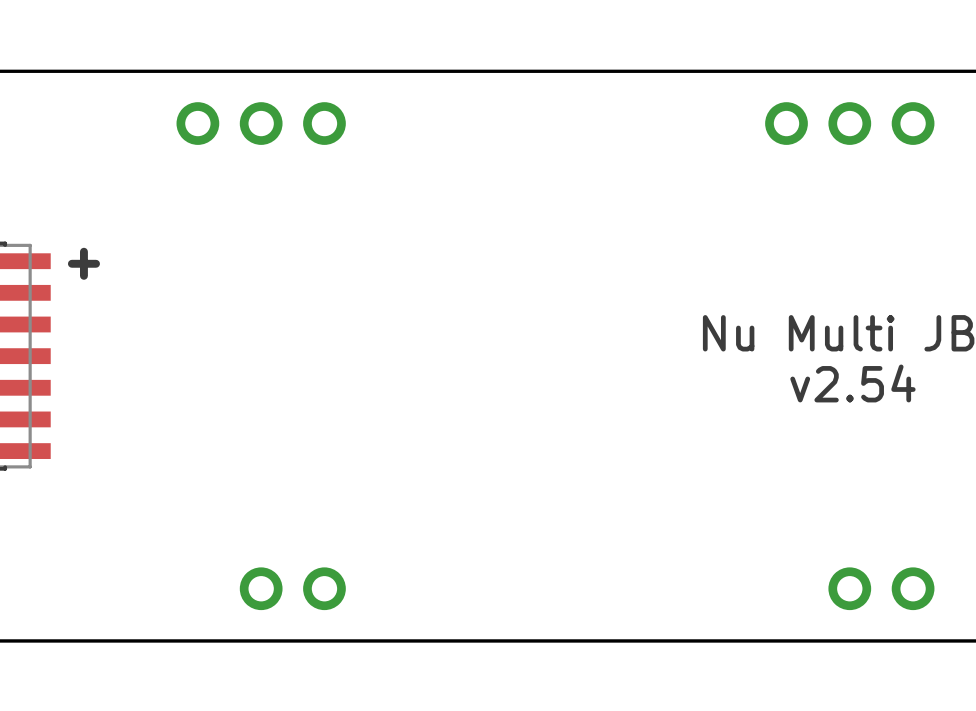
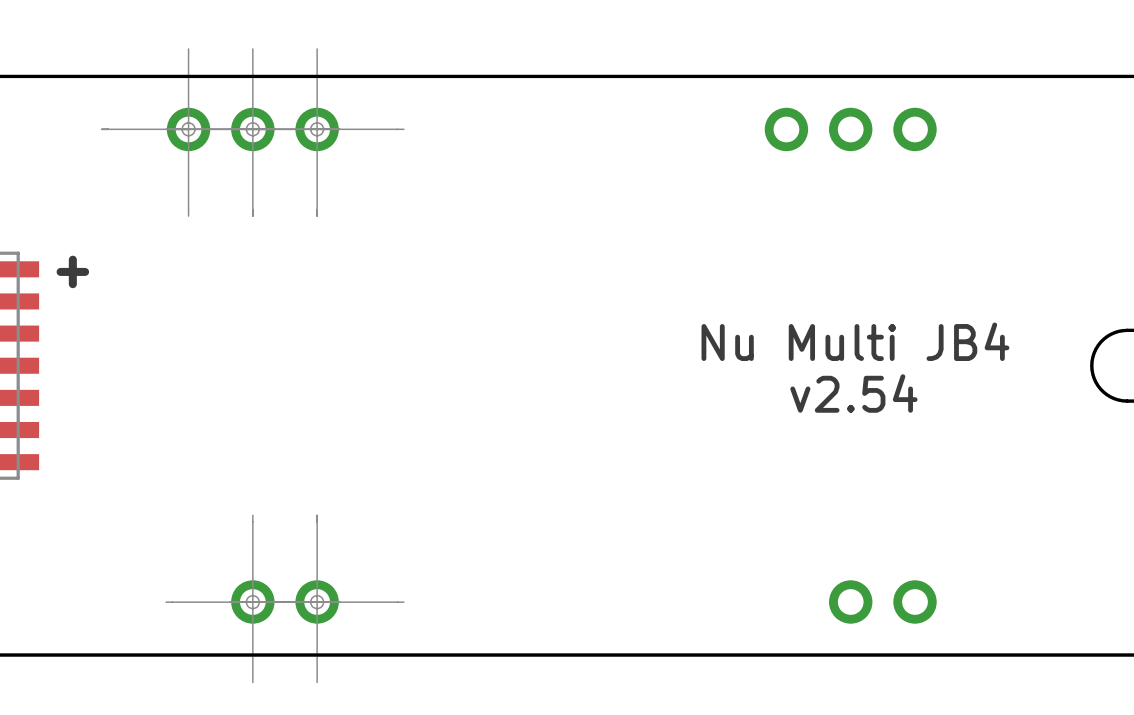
line: none -> (188, 48) (188, 216)
line: none -> (252, 48) (252, 216)
line: none -> (317, 48) (317, 216)
drawing: none -> [181, 122, 196, 136]
drawing: none -> [246, 122, 260, 136]
drawing: none -> [310, 122, 324, 136]
line: none -> (101, 129) (403, 129)
line: none -> (252, 515) (252, 682)
line: none -> (317, 515) (317, 682)
drawing: none -> [246, 595, 260, 609]
drawing: none -> [310, 595, 324, 609]
line: none -> (166, 602) (403, 602)

